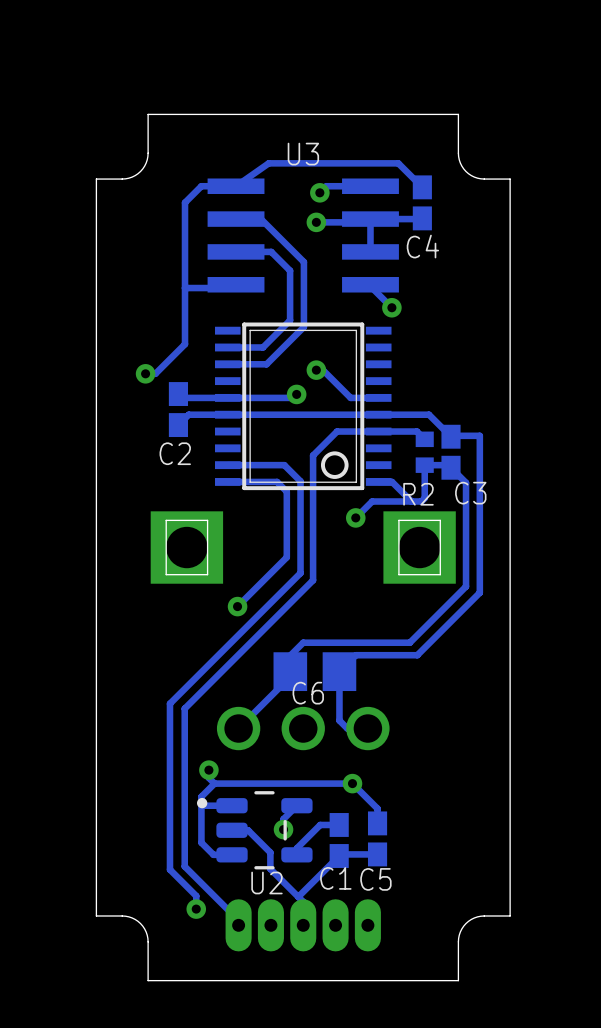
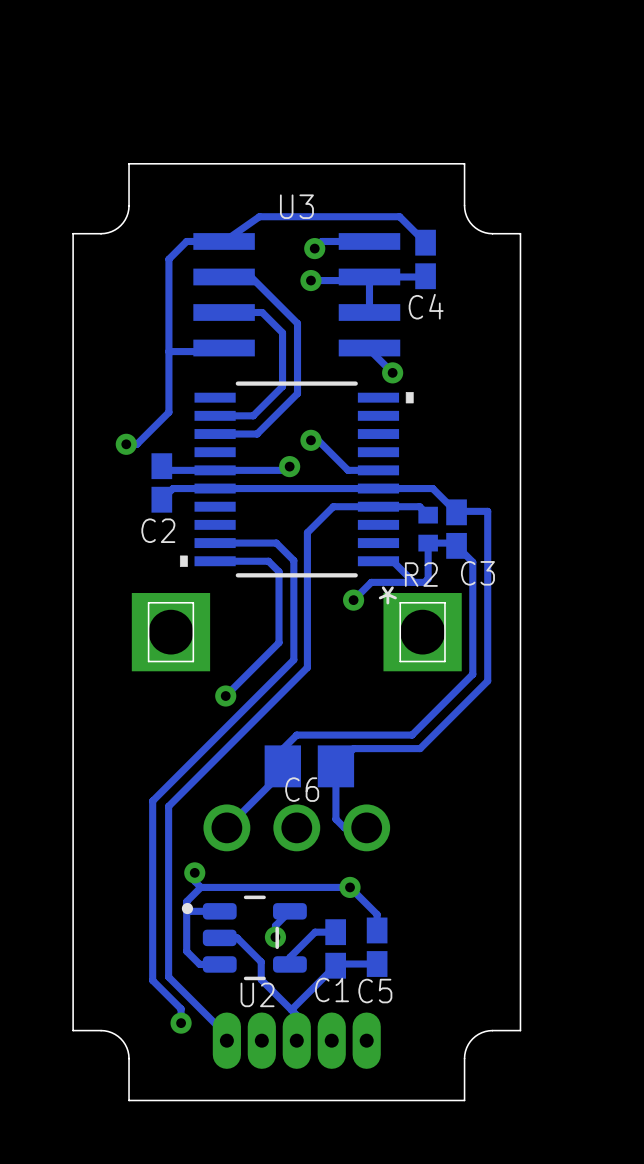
part footprint: [215, 322, 392, 491] -> [179, 381, 414, 578]

